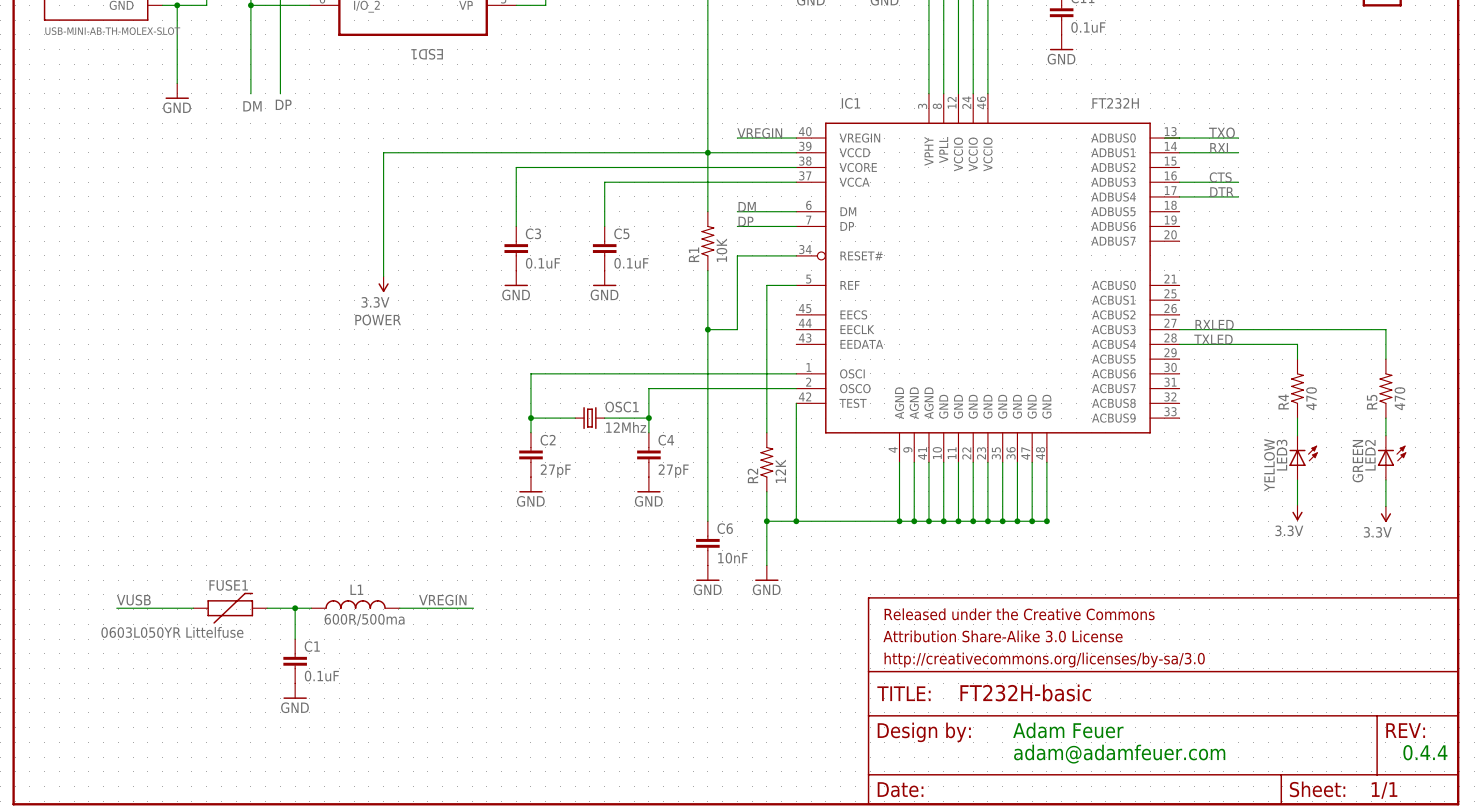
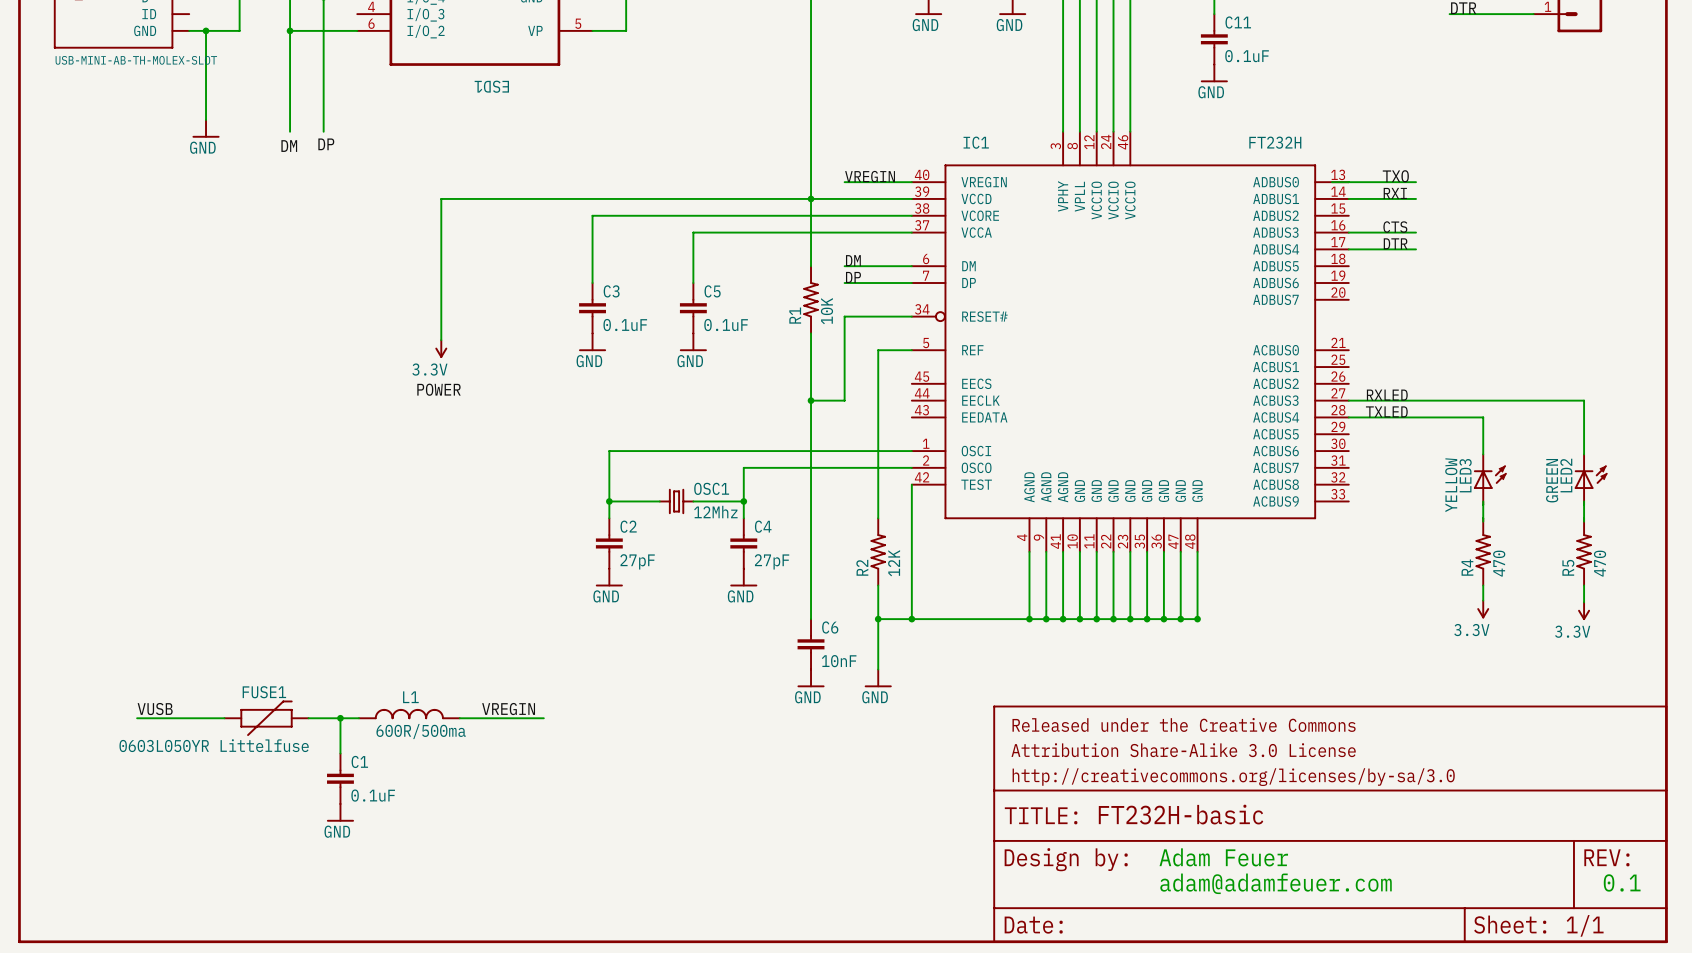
R4 position: (1297, 388) -> (1483, 551)
R5 position: (1385, 388) -> (1584, 551)
LED3 position: (1303, 457) -> (1490, 479)
LED2 position: (1392, 457) -> (1591, 479)
text: 0.4.4 (1425, 752) -> 0.1 (1622, 882)

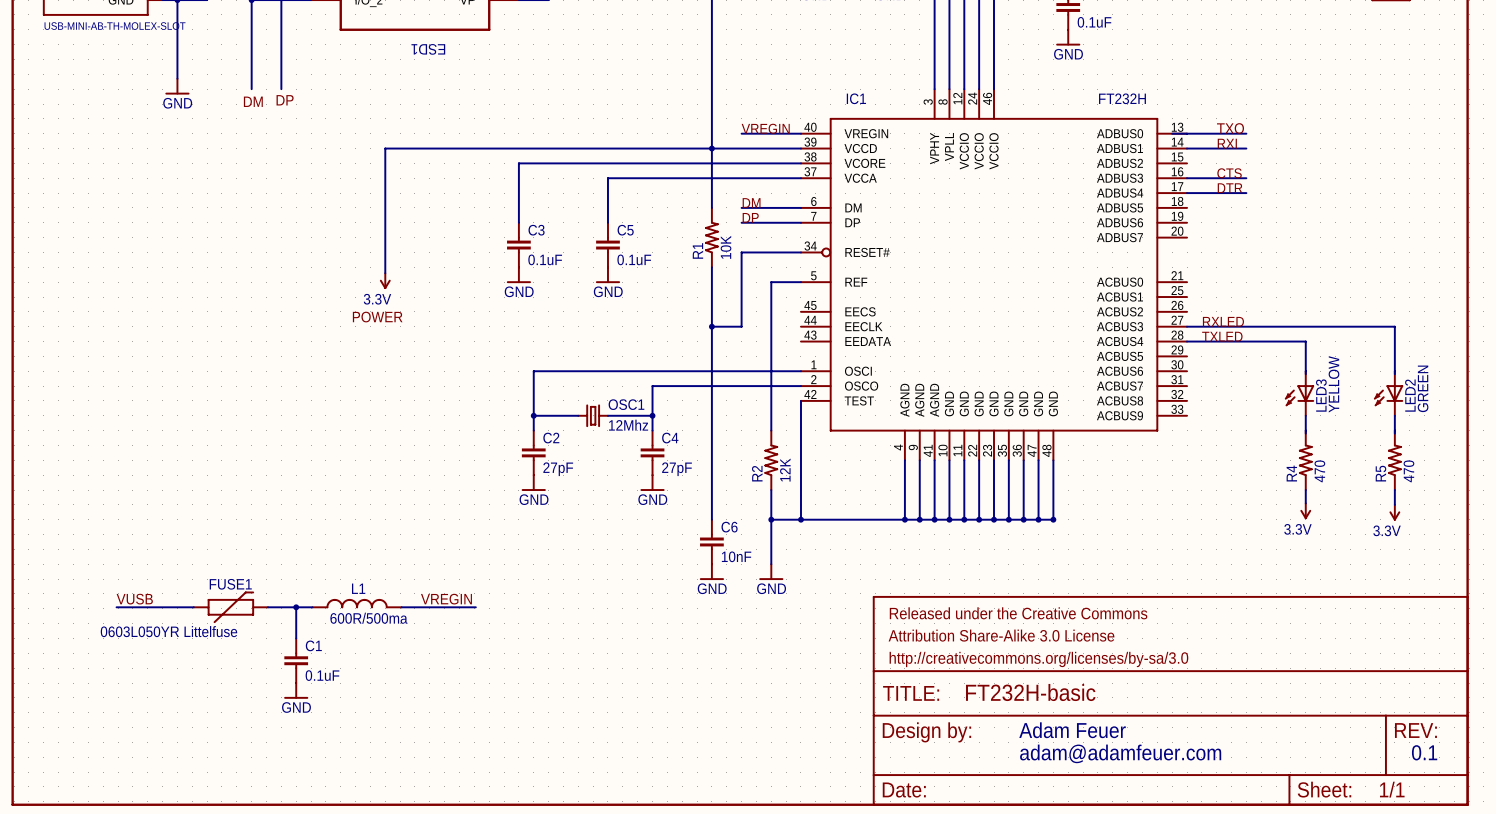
LED3 rotation: 0° (1490, 477) -> 180° (1299, 395)
LED2 rotation: 0° (1591, 477) -> 180° (1388, 395)

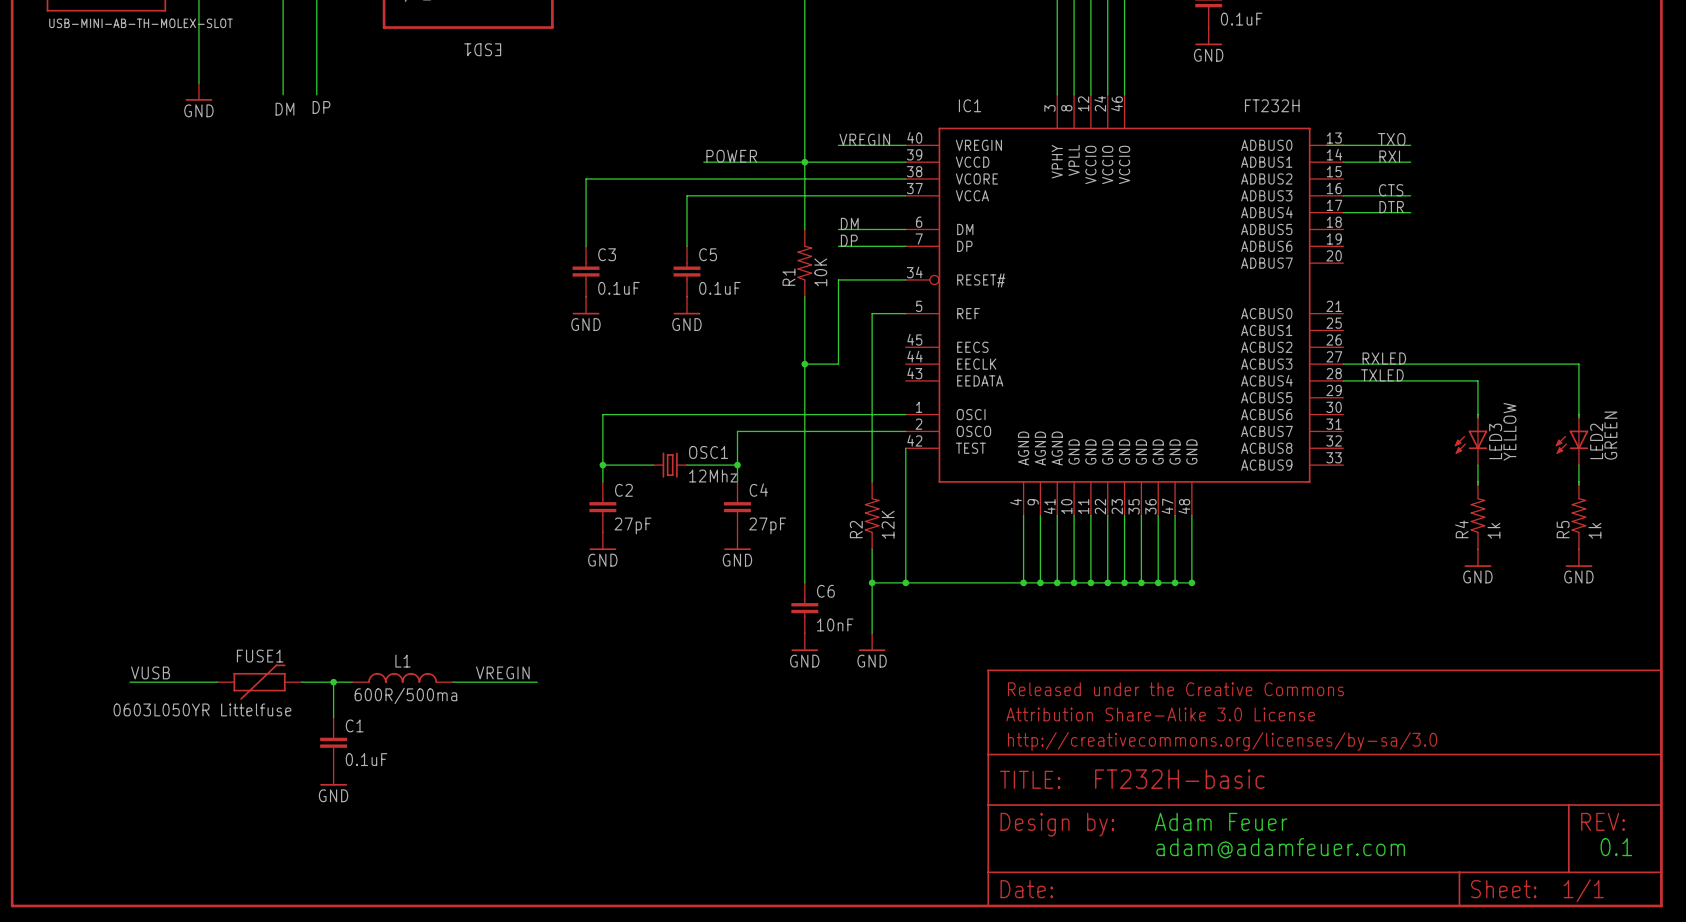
label: none -> POWER (731, 156)
wire: (622, 148) (385, 148) (385, 273) -> none
power symbol: 3.3V (385, 281) -> none
label: POWER (377, 317) -> none
R4 value: 470 (1319, 471) -> 1k (1493, 530)
R5 value: 470 (1408, 471) -> 1k (1594, 530)
power symbol: none -> GND (1477, 558)
power symbol: none -> GND (1578, 558)
power symbol: 3.3V (1305, 511) -> none
power symbol: 3.3V (1394, 512) -> none

